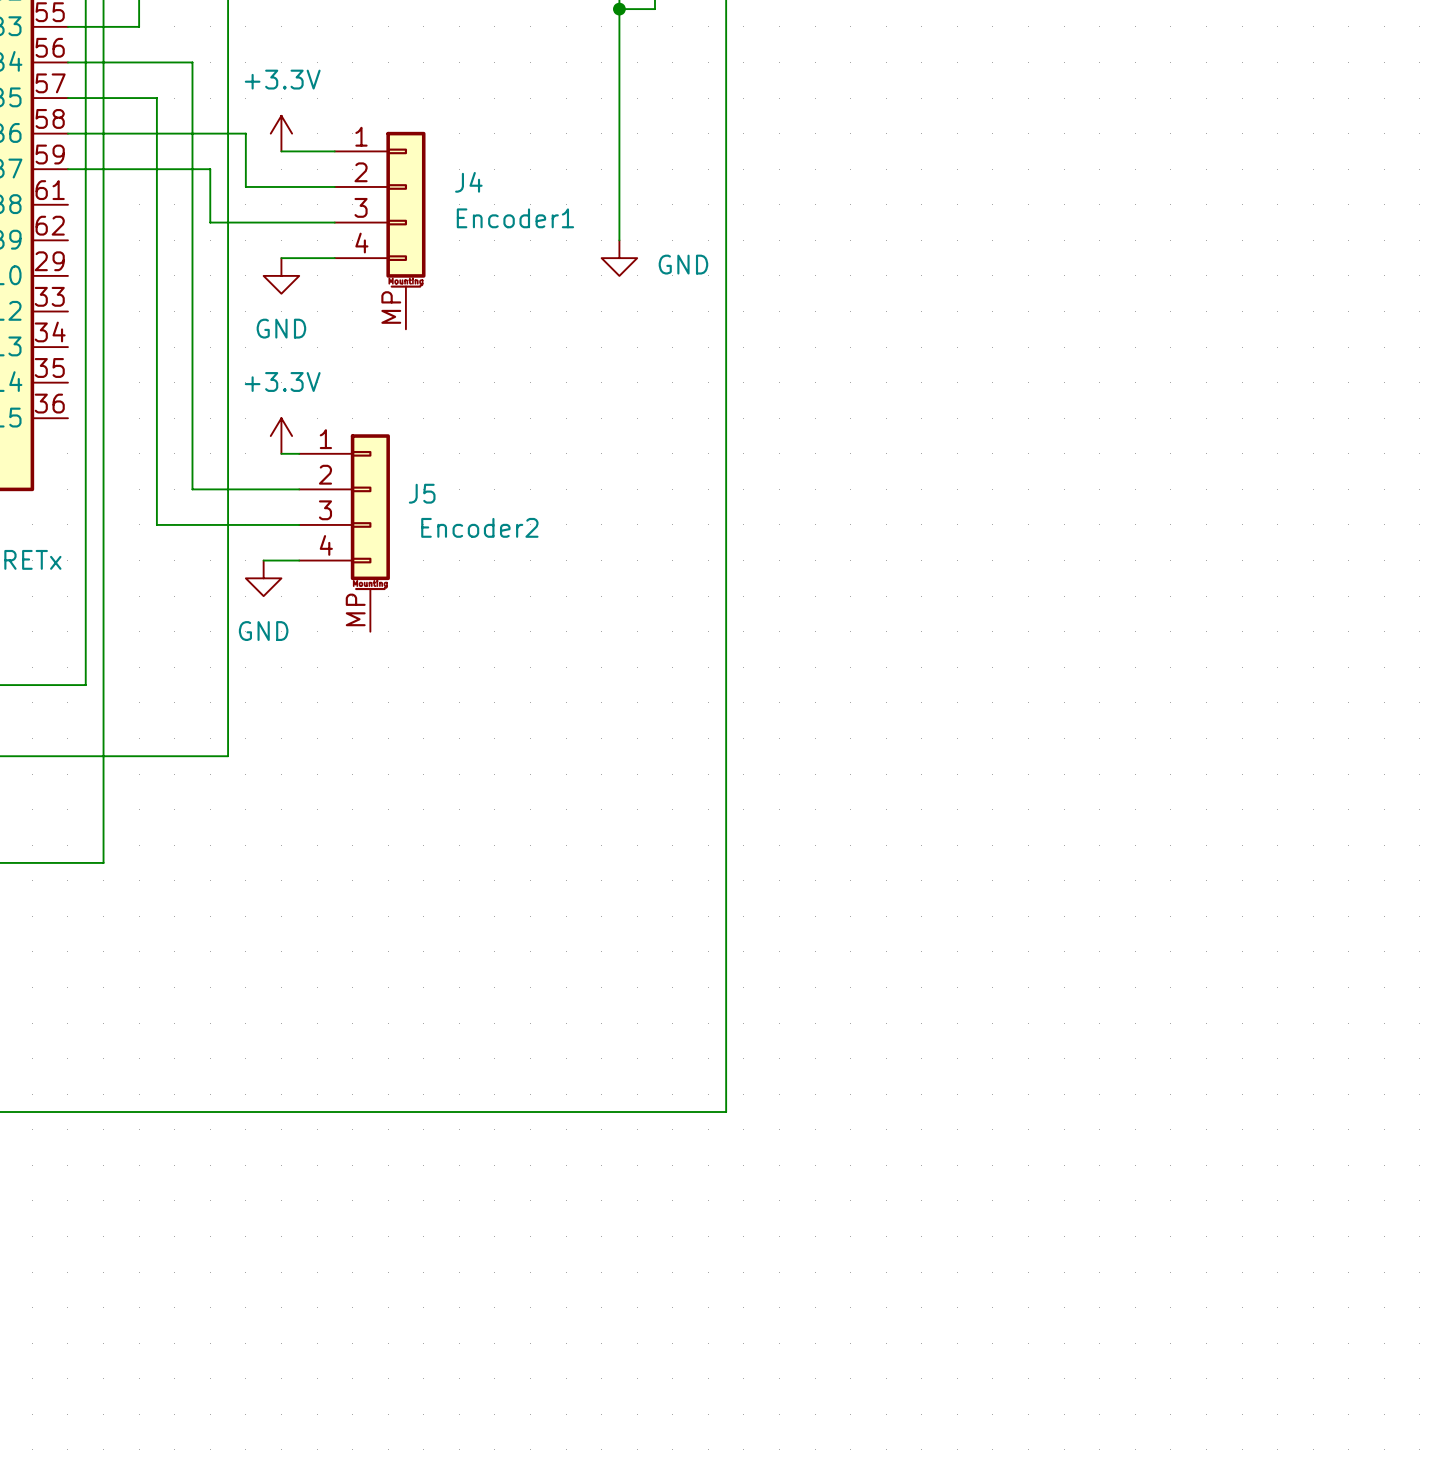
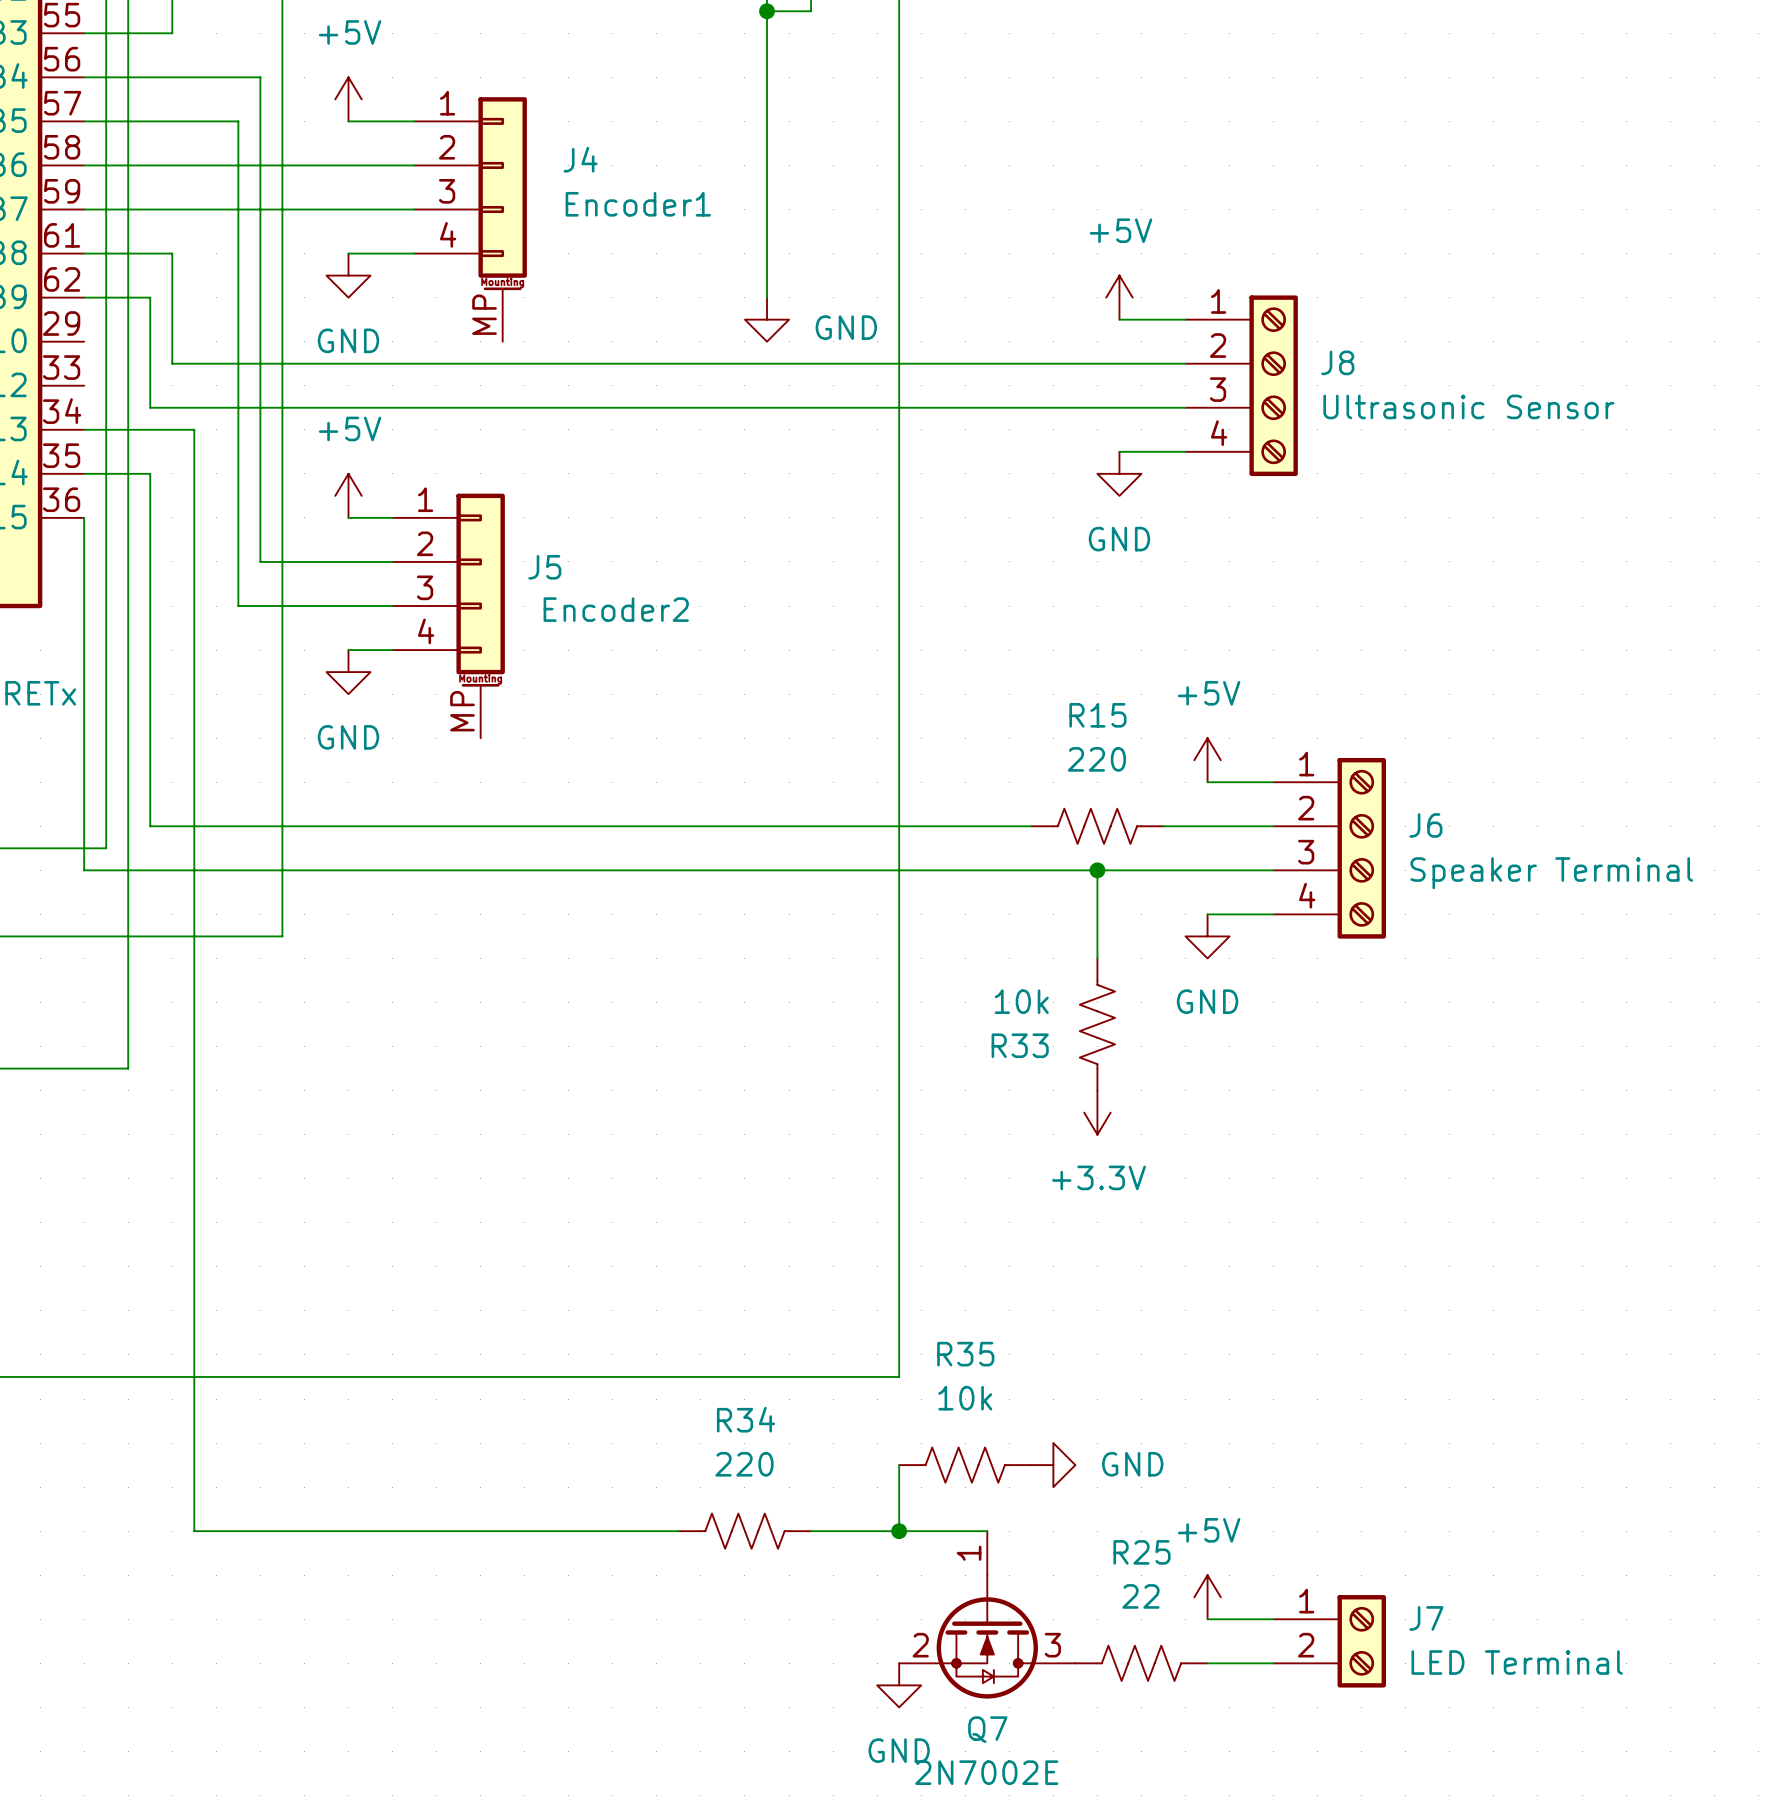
wire: (192, 62) (192, 98) -> (194, 121) (238, 121)
wire: none -> (238, 77) (260, 77) (260, 209) (414, 209)
power symbol: none -> +5V (348, 99)
wire: (156, 98) (156, 347) -> (84, 429) (194, 429)
wire: (245, 133) (245, 186) (334, 186) -> (304, 165) (414, 165)
power symbol: +3.3V (281, 133) -> none
wire: (281, 151) (334, 151) -> (348, 121) (414, 121)
wire: none -> (84, 253) (172, 253) (172, 363) (1185, 363)
wire: (210, 222) (334, 222) -> (260, 275) (260, 561) (348, 561)
J4 position: (380, 230) -> (470, 219)
wire: none -> (84, 297) (150, 297) (150, 407) (1185, 407)
power symbol: none -> +5V (1119, 297)
wire: (281, 258) (334, 258) -> (348, 253) (414, 253)
wire: none -> (1119, 319) (1185, 319)
power symbol position: GND (281, 275) -> GND (348, 275)
J8: none -> Ultrasonic Sensor (1241, 385)
wire: none -> (1119, 451) (1185, 451)
wire: none -> (84, 473) (150, 473) (150, 826) (1031, 826)
power symbol: none -> GND (1119, 473)
power symbol: none -> +5V (348, 495)
wire: none -> (84, 517) (84, 870) (1273, 870)
power symbol: +3.3V (281, 436) -> none
wire: (156, 524) (281, 524) -> (194, 650) (194, 1531) (678, 1531)
J5 position: (344, 532) -> (448, 615)
wire: (263, 560) (299, 560) -> (348, 517) (392, 517)
power symbol position: GND (263, 578) -> GND (348, 672)
power symbol: none -> +5V (1207, 760)
wire: none -> (1207, 782) (1273, 782)
R15: none -> 220 (1097, 826)
wire: none -> (1163, 826) (1273, 826)
J6: none -> Speaker Terminal (1329, 848)
wire: none -> (1097, 870) (1097, 958)
junction: none -> (1097, 870)
wire: none -> (1207, 914) (1273, 914)
power symbol: none -> GND (1207, 936)
R33: none -> 10k (1097, 1024)
power symbol: none -> +3.3V (1097, 1112)
wire: none -> (899, 1465) (899, 1531)
R35: none -> 10k (965, 1465)
power symbol: none -> GND (1053, 1465)
R34: none -> 220 (744, 1531)
wire: none -> (811, 1531) (987, 1531)
junction: none -> (899, 1531)
power symbol: none -> +5V (1207, 1597)
Q7: none -> 2N7002E (987, 1614)
wire: none -> (1207, 1619) (1273, 1619)
J7: none -> LED Terminal (1329, 1641)
R25: none -> 22 (1141, 1663)
wire: none -> (1207, 1663) (1273, 1663)
power symbol: none -> GND (899, 1685)

